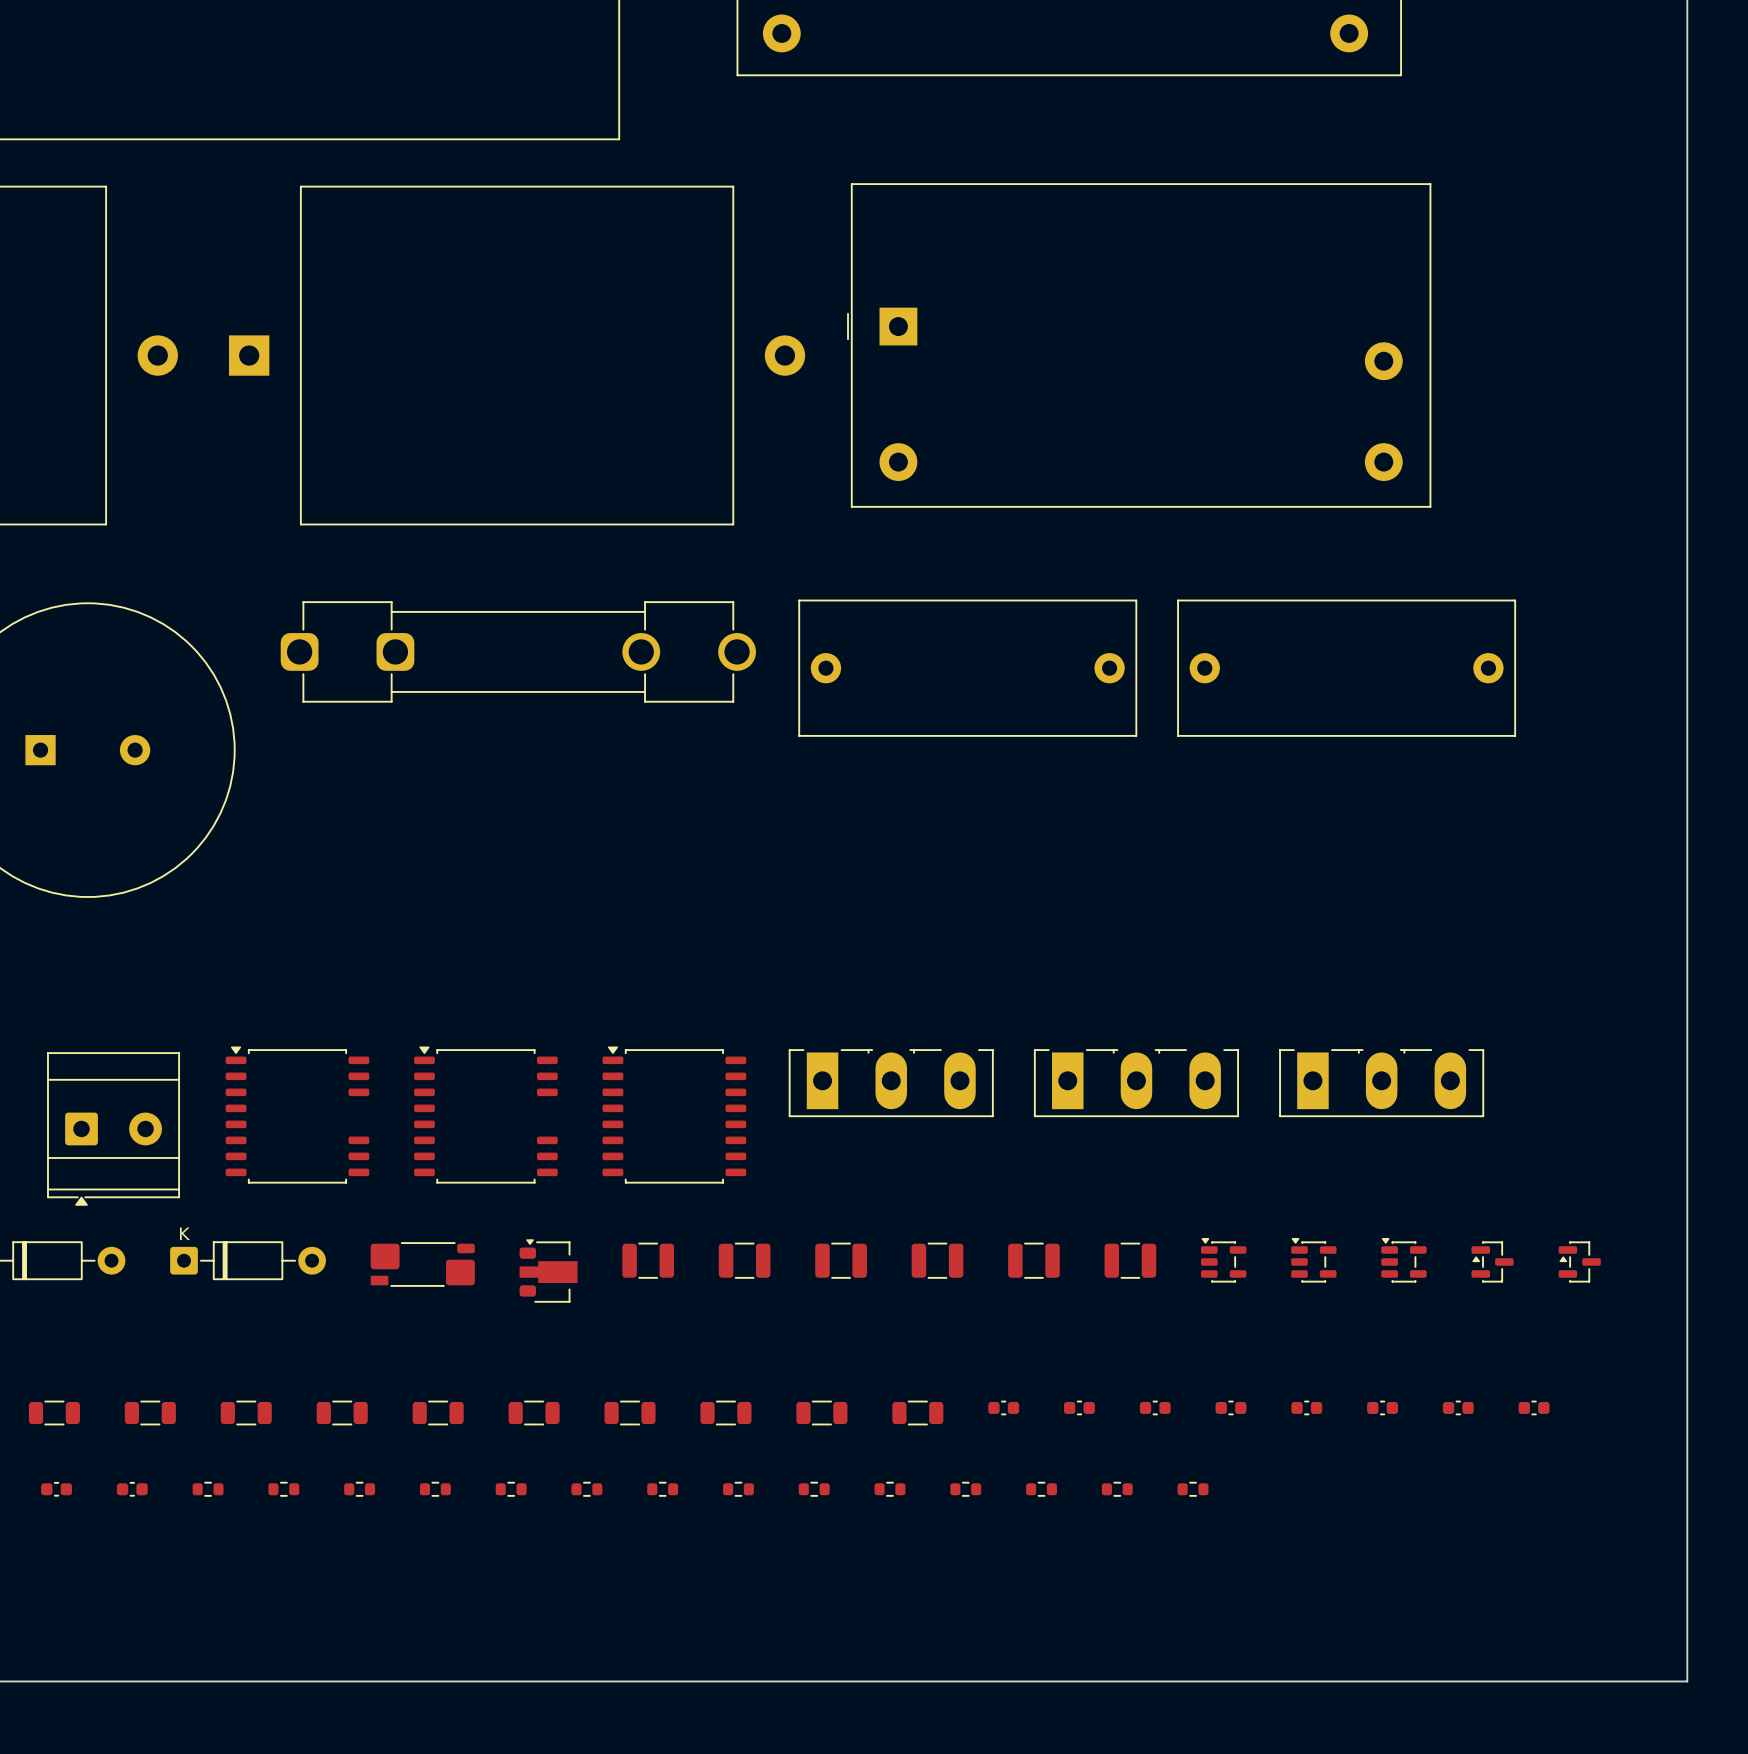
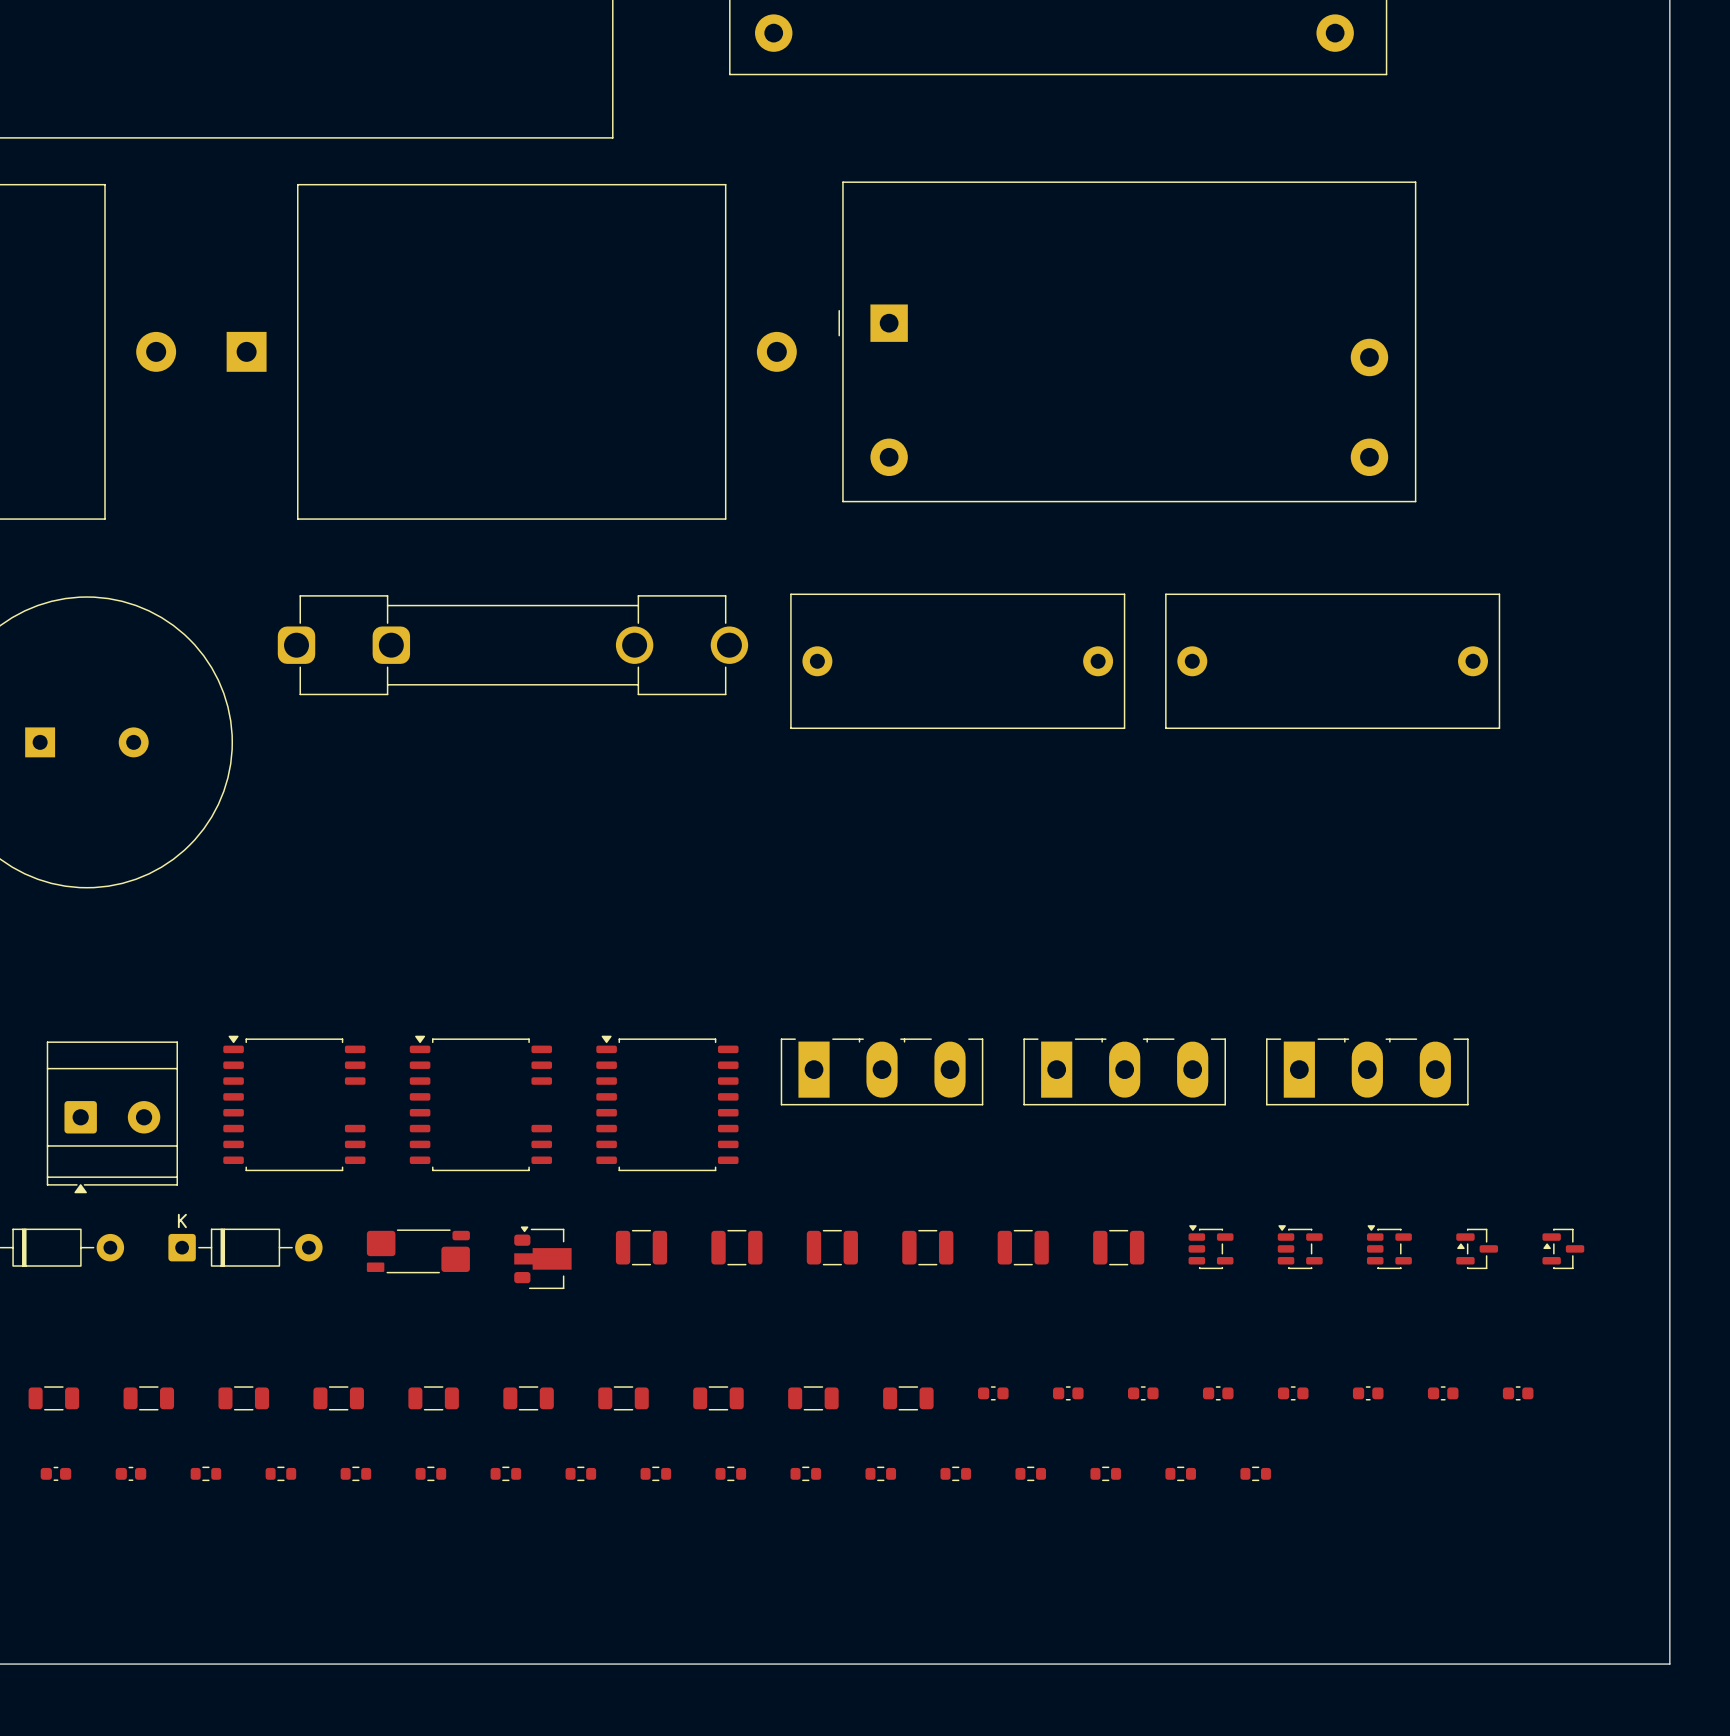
part: none -> (1255, 1473)

